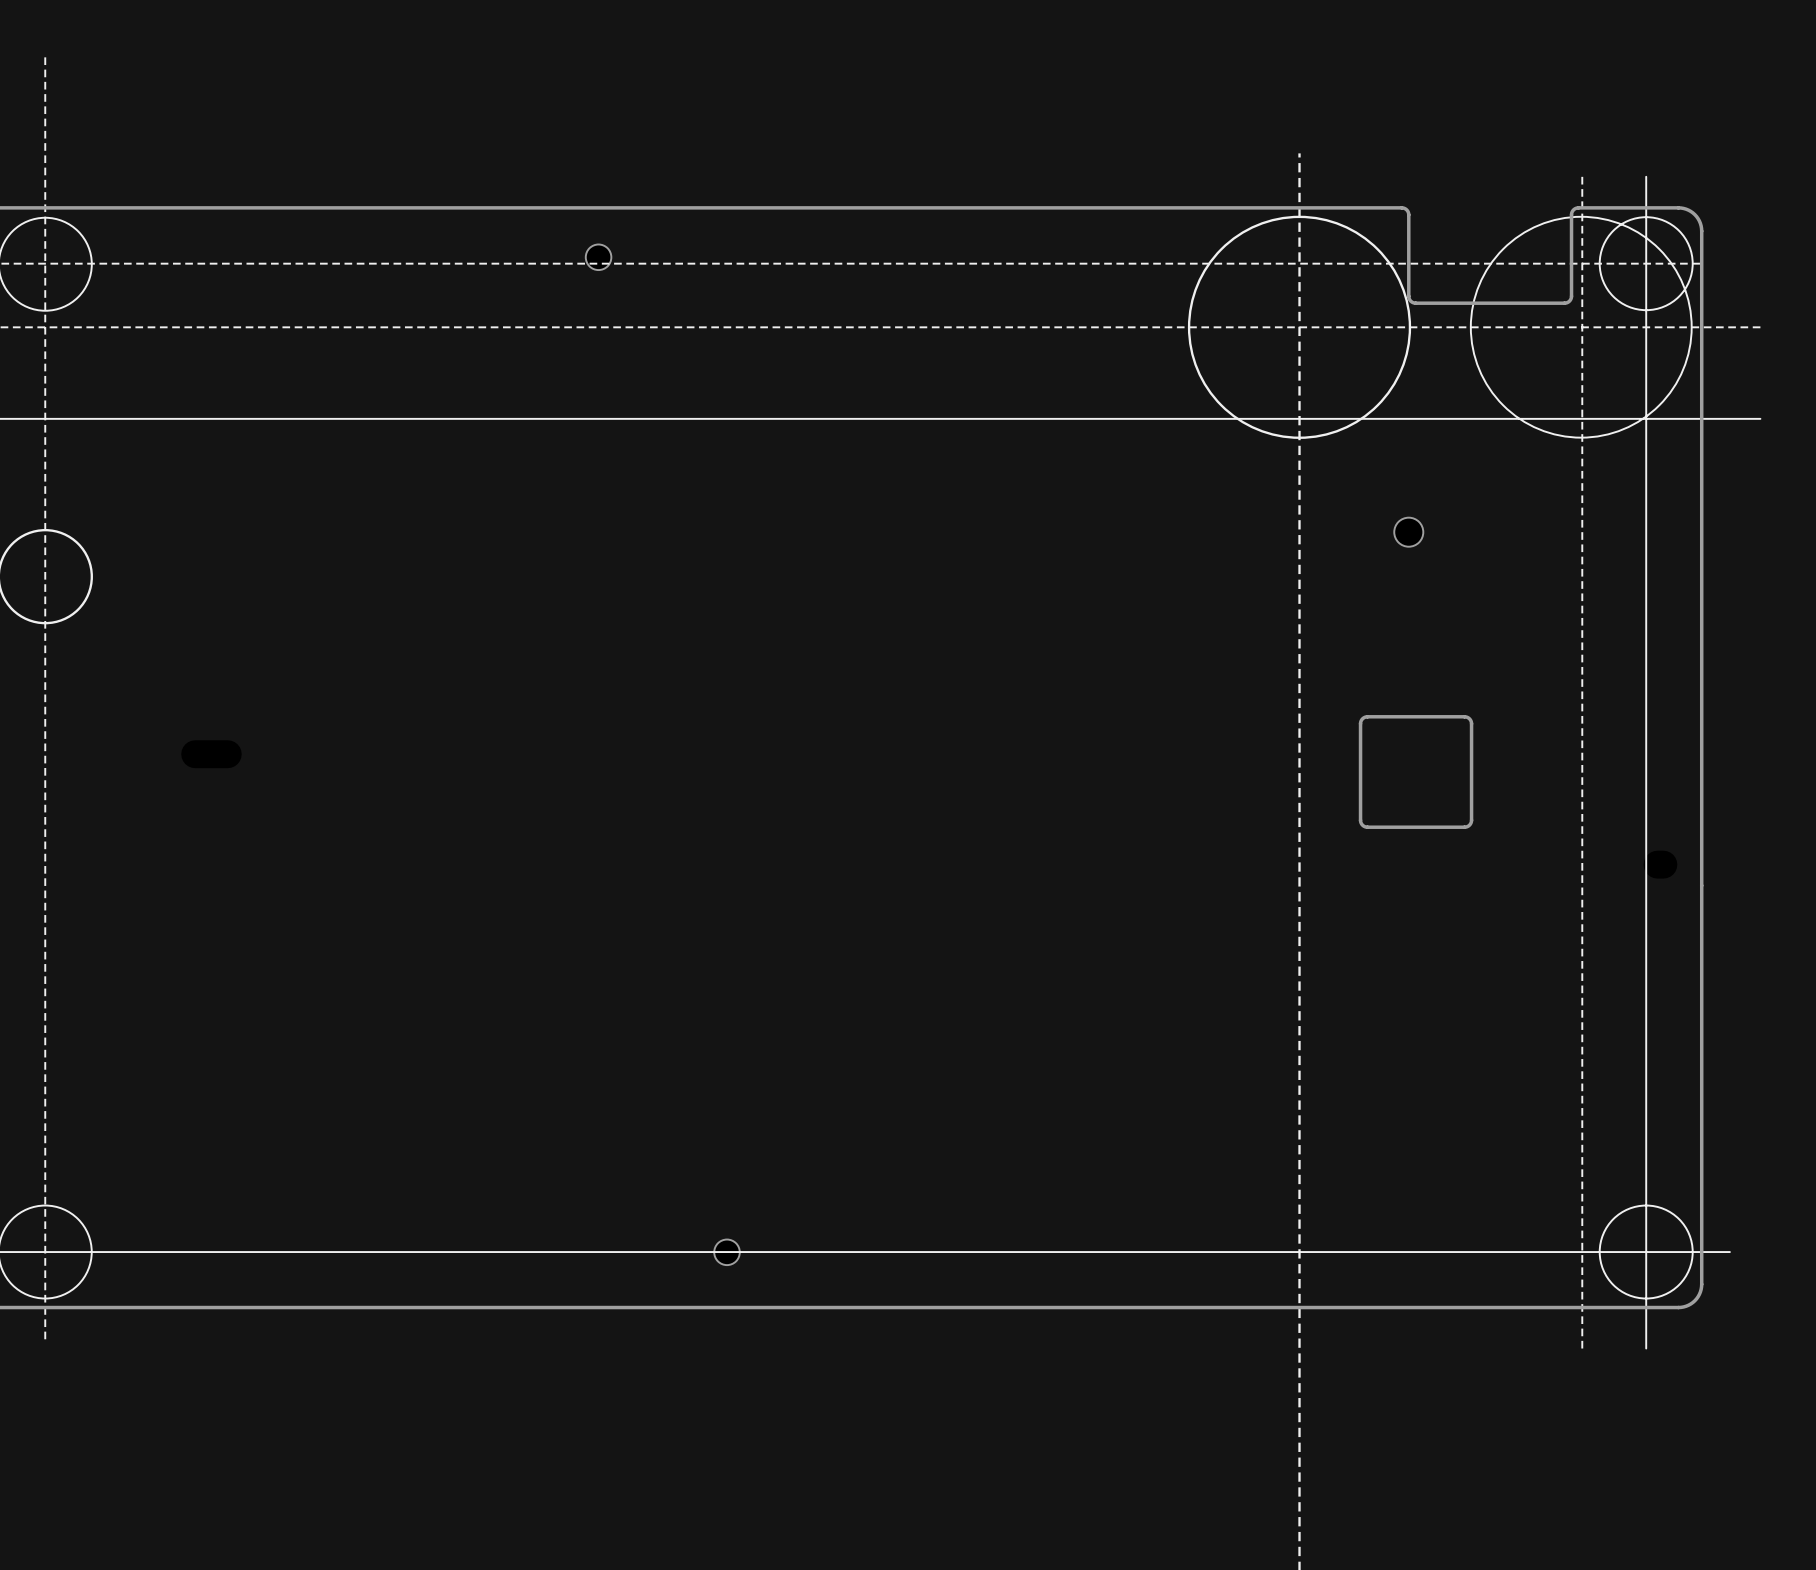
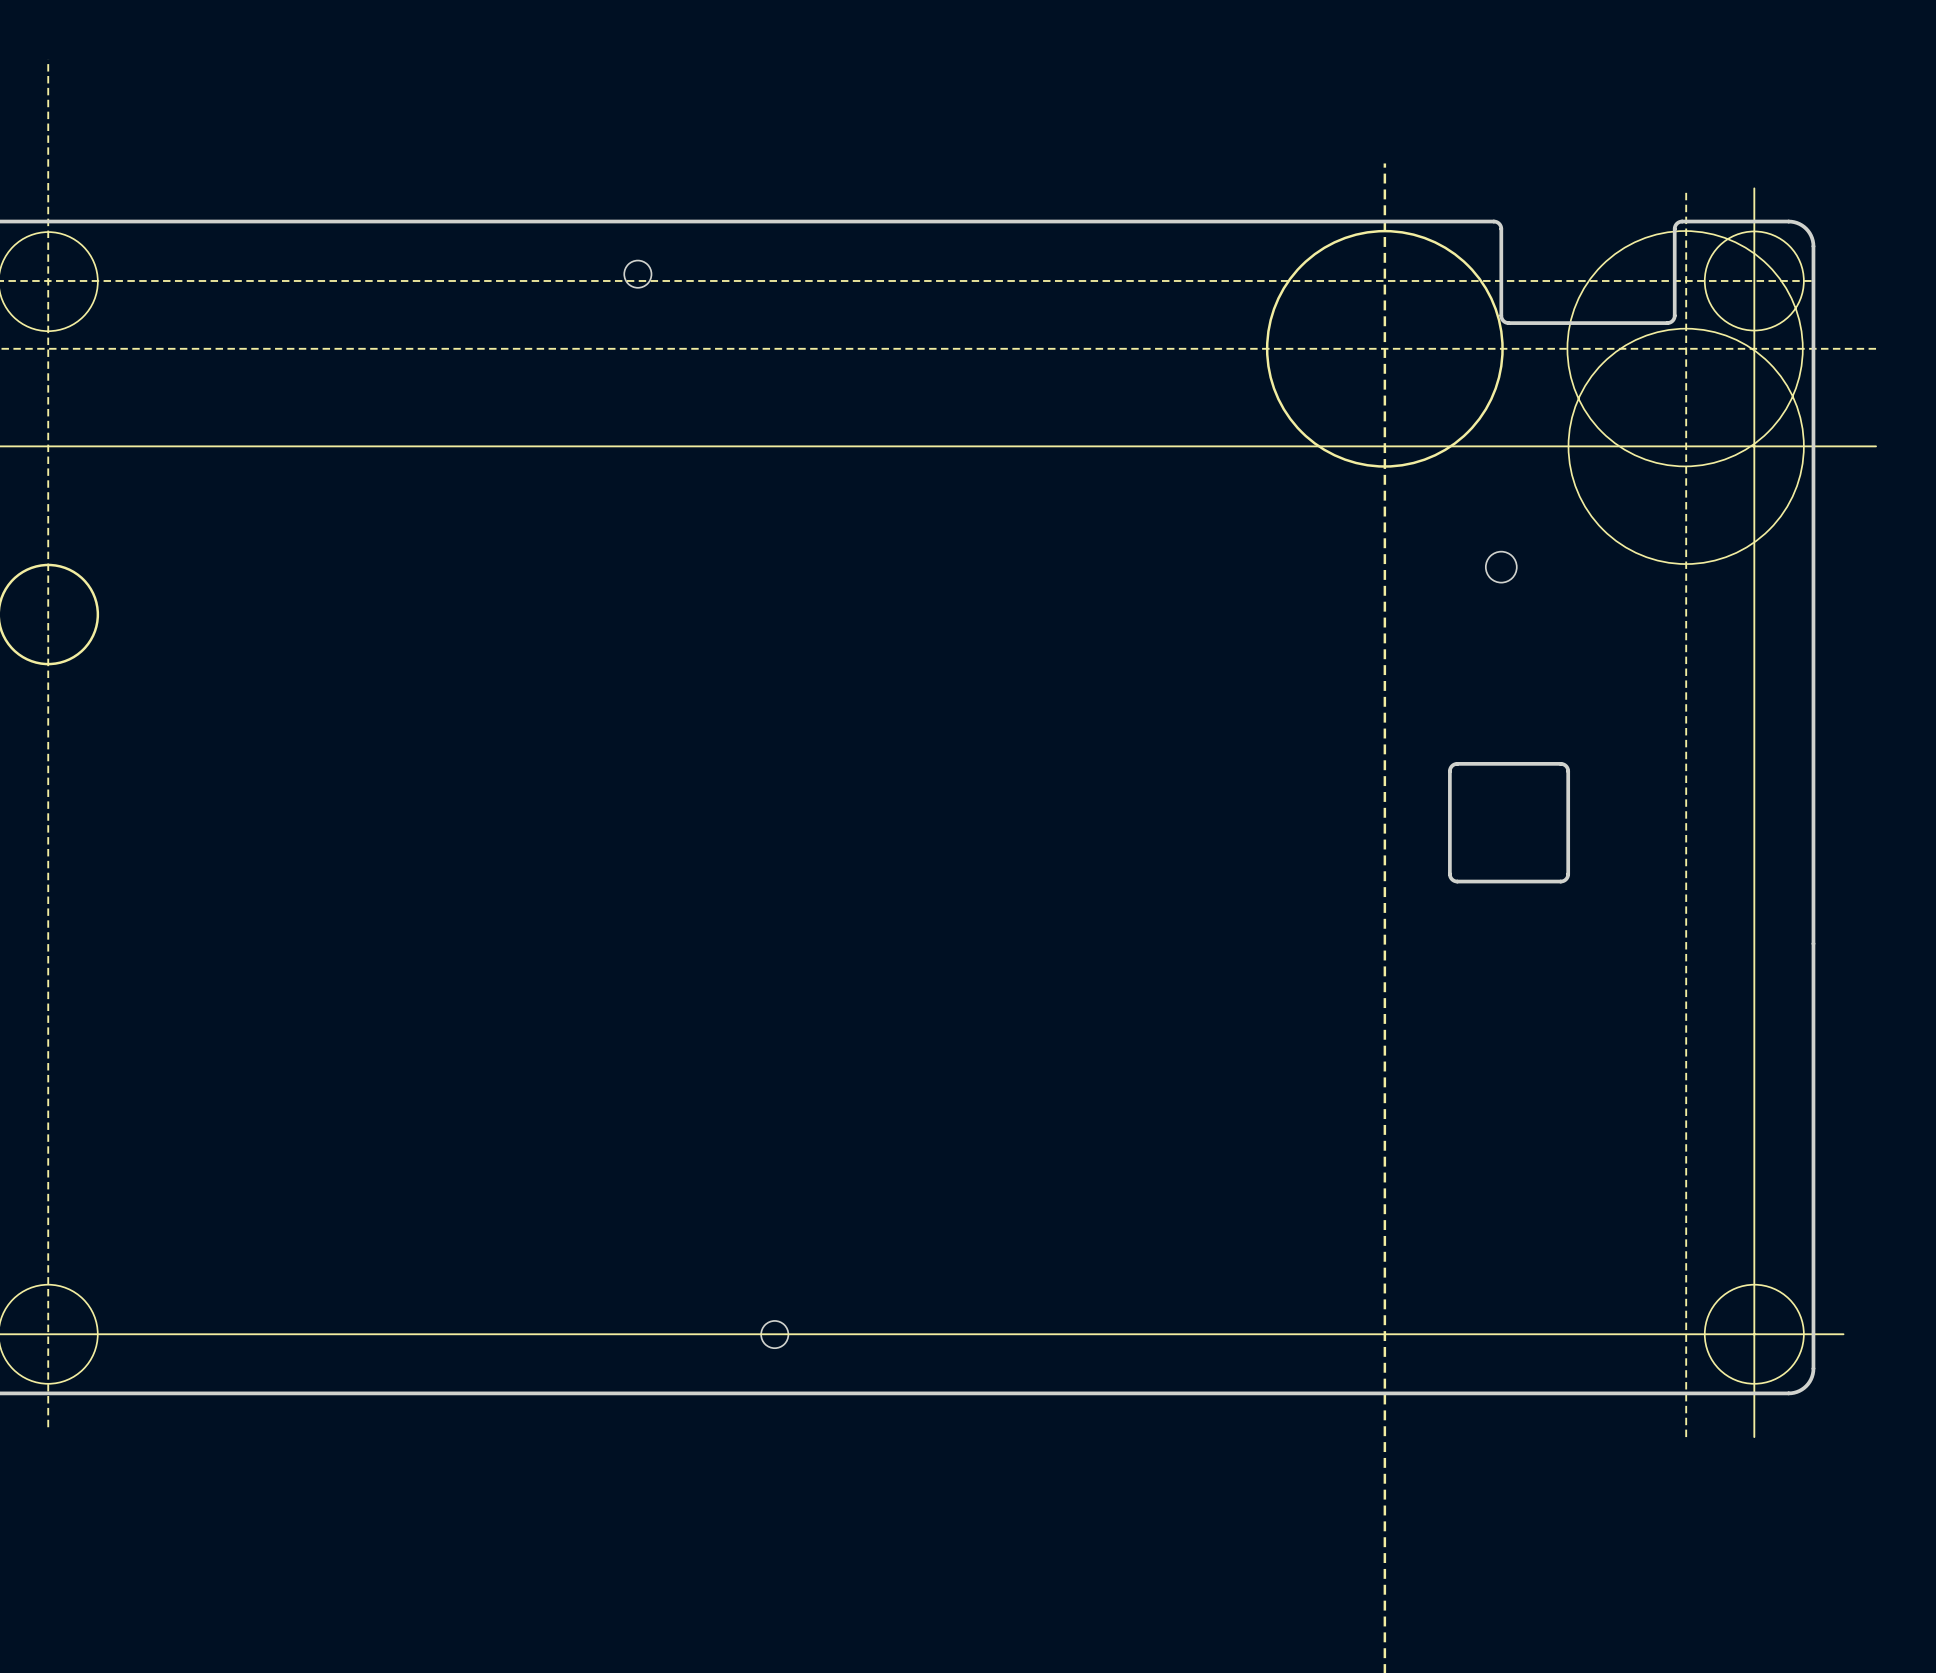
drawing: none -> [1567, 327, 1805, 565]

